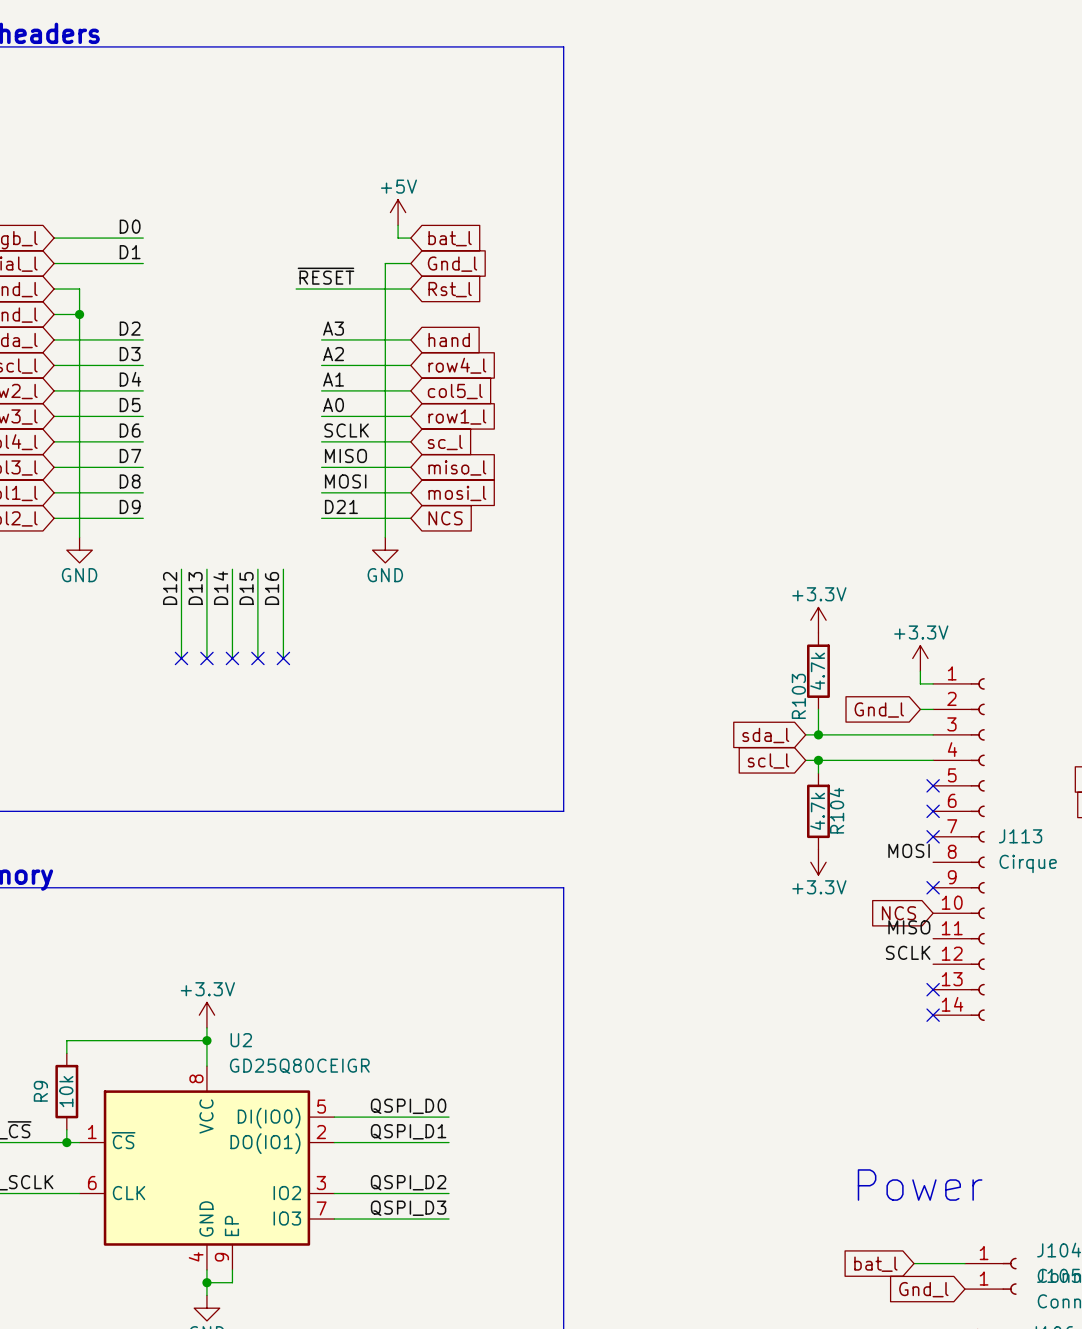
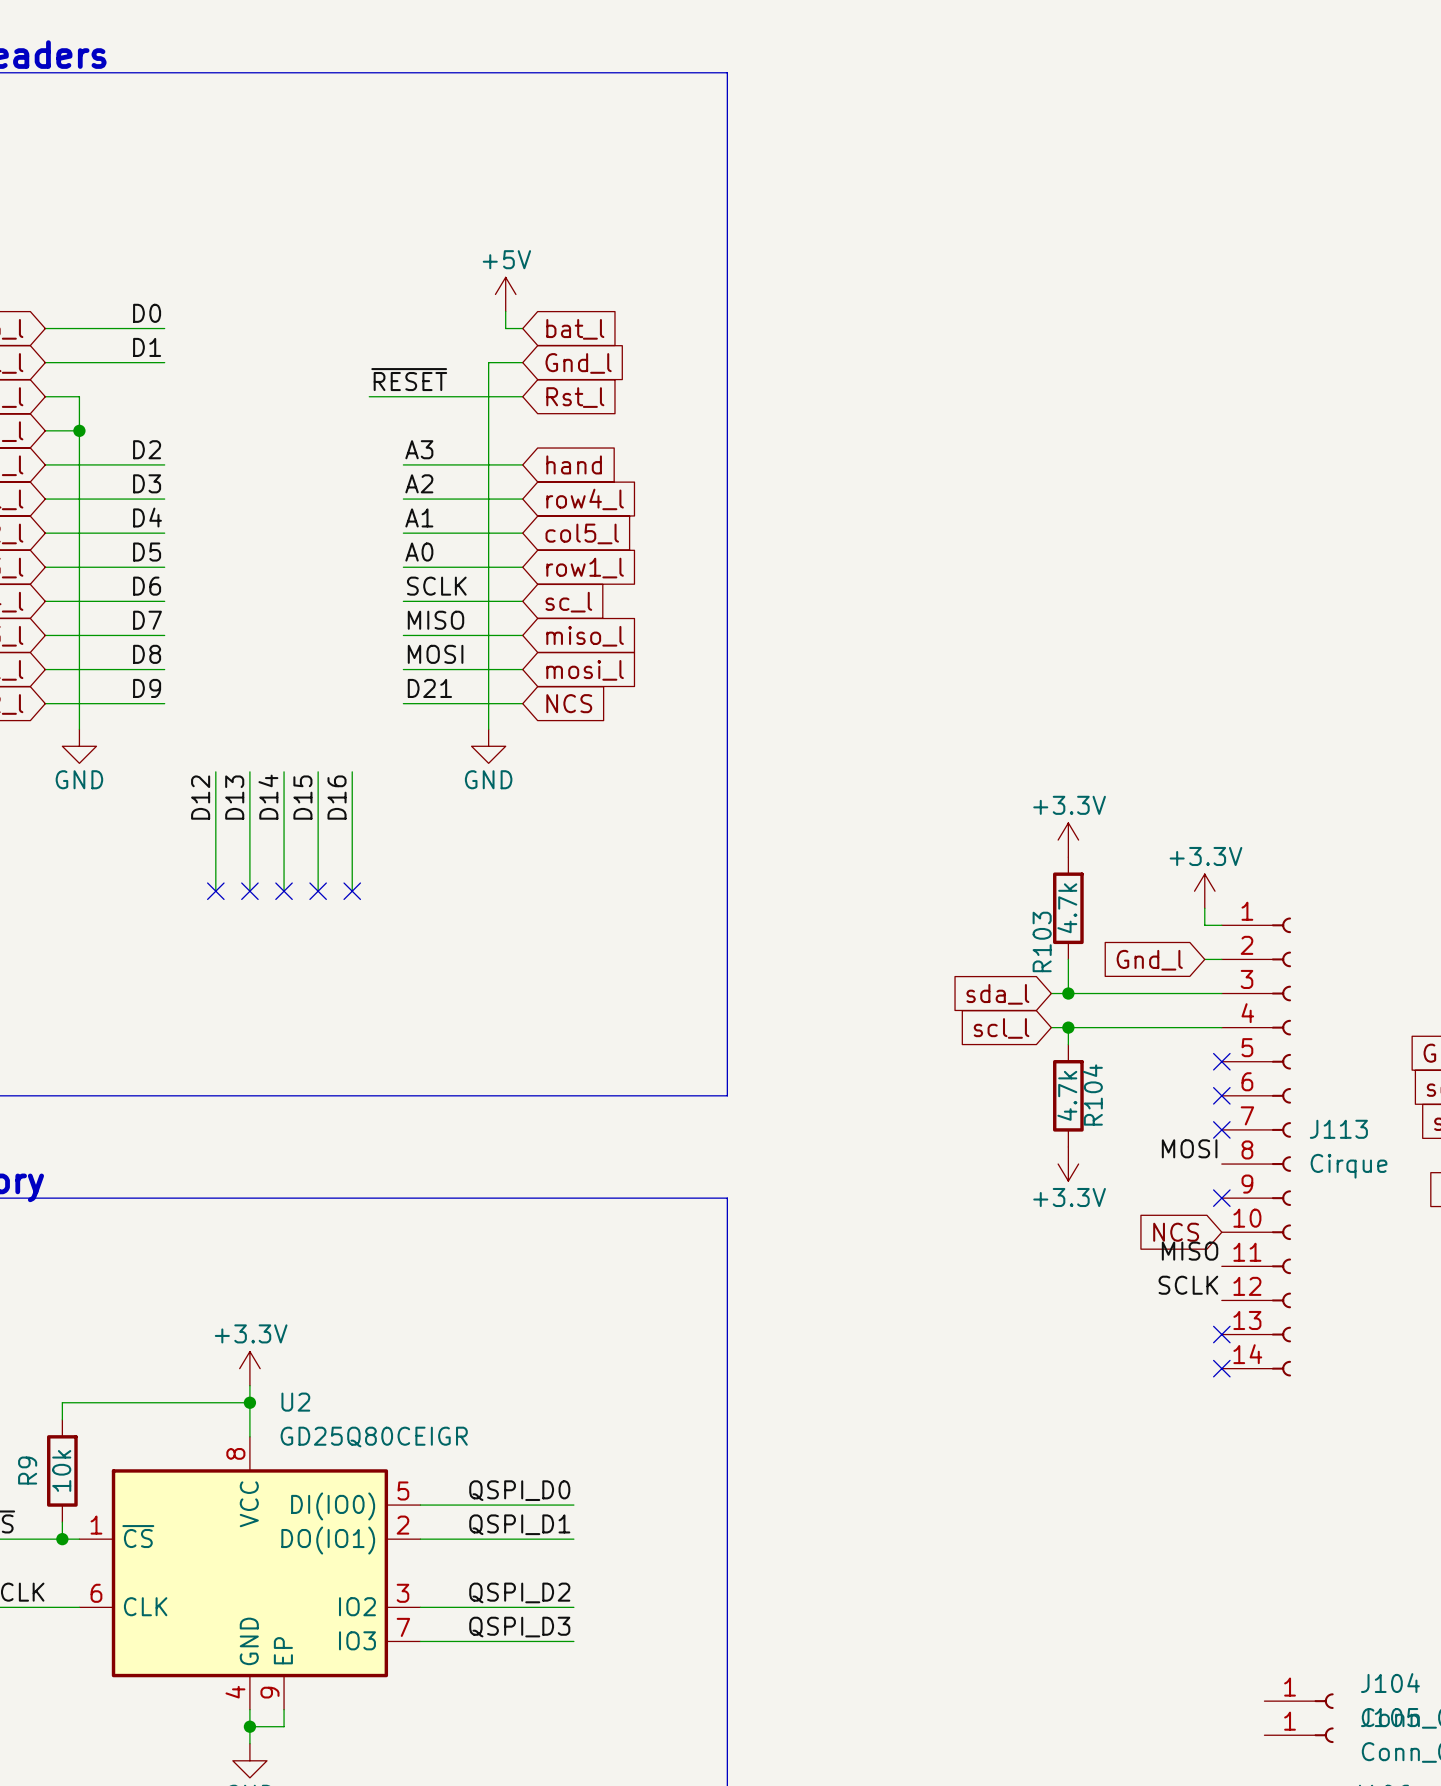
text: Power (920, 1185) -> none
wire: (914, 1263) (964, 1263) -> none
global label: bat_l (875, 1264) -> none
global label: Gnd_l (923, 1289) -> none

